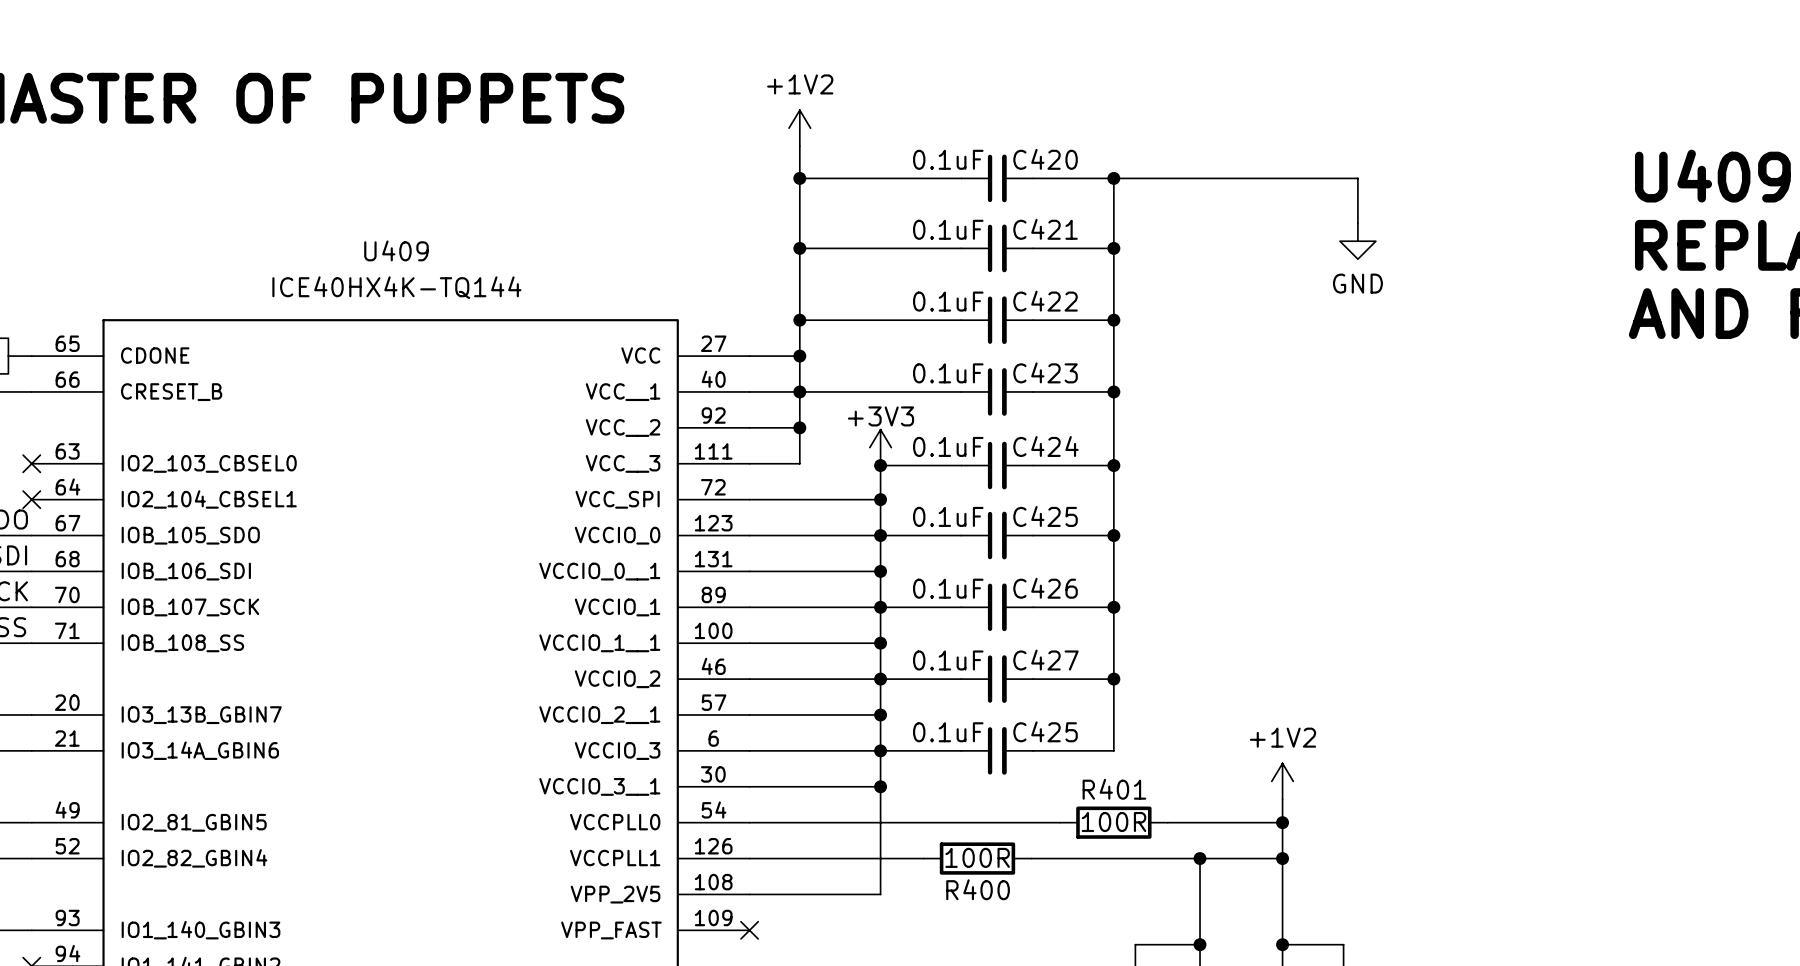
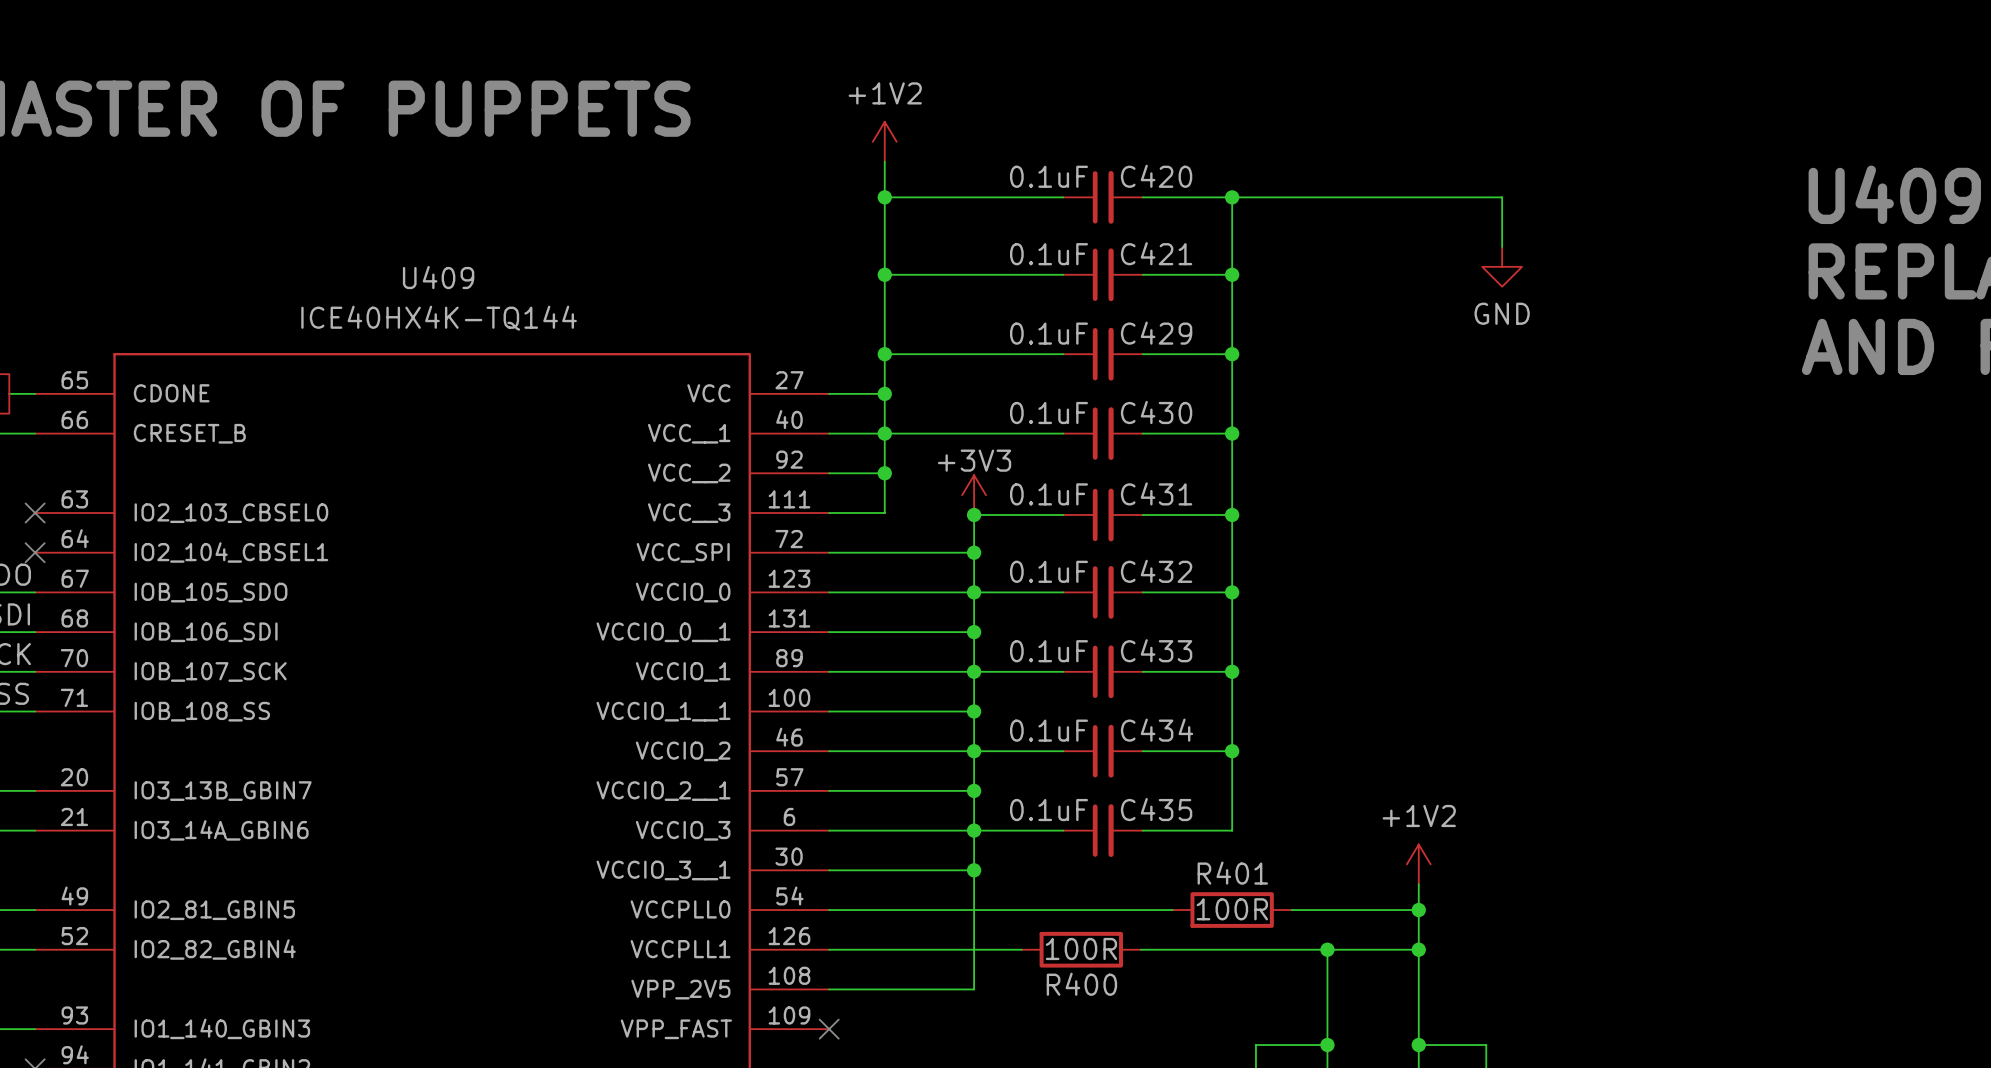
C422 name: C422 (1045, 301) -> C429 (1156, 333)
C423 name: C423 (1045, 372) -> C430 (1156, 412)
C424 name: C424 (1045, 446) -> C431 (1156, 493)
C425 name: C425 (1045, 516) -> C432 (1156, 571)
C426 name: C426 (1045, 588) -> C433 (1156, 650)
C427 name: C427 (1045, 660) -> C434 (1157, 730)
C425 name: C425 (1045, 731) -> C435 (1156, 809)

